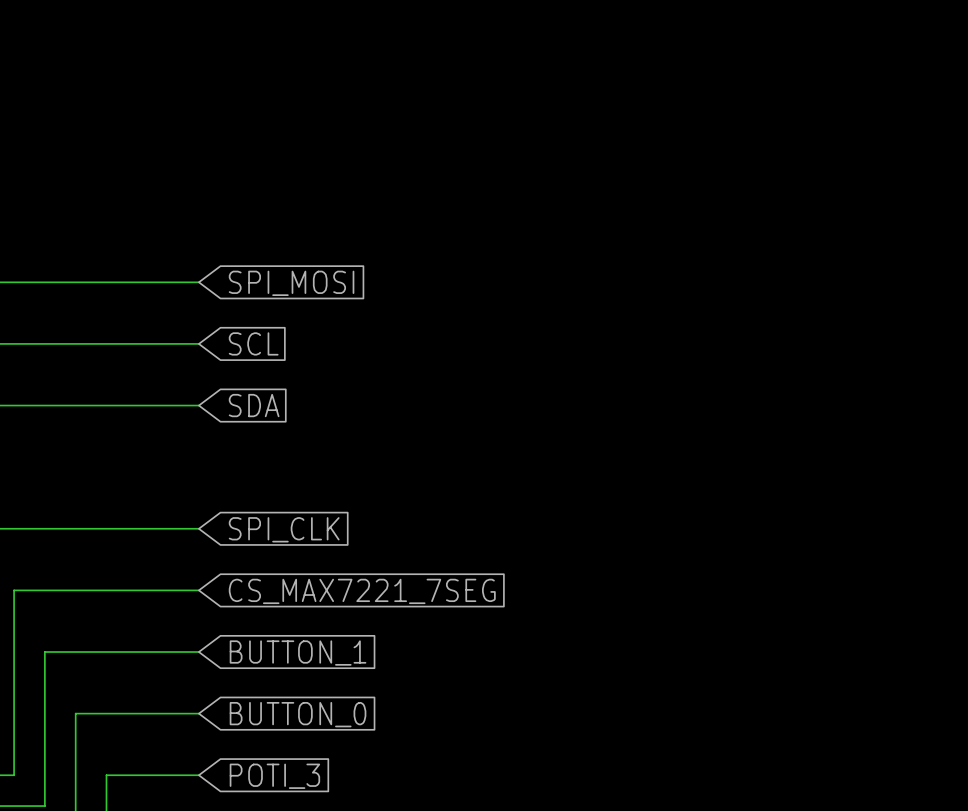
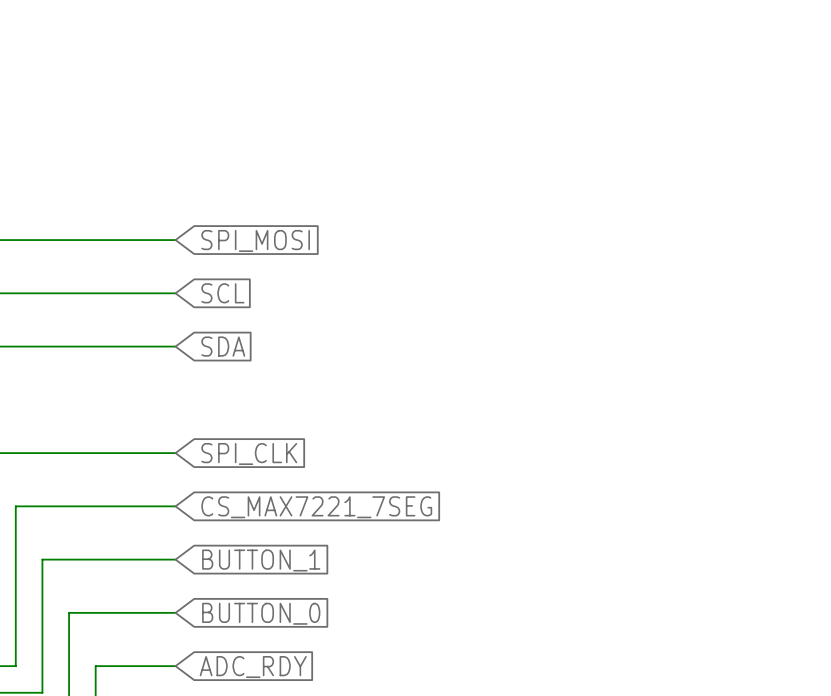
global label: POTI_3 (274, 776) -> ADC_RDY (253, 667)

